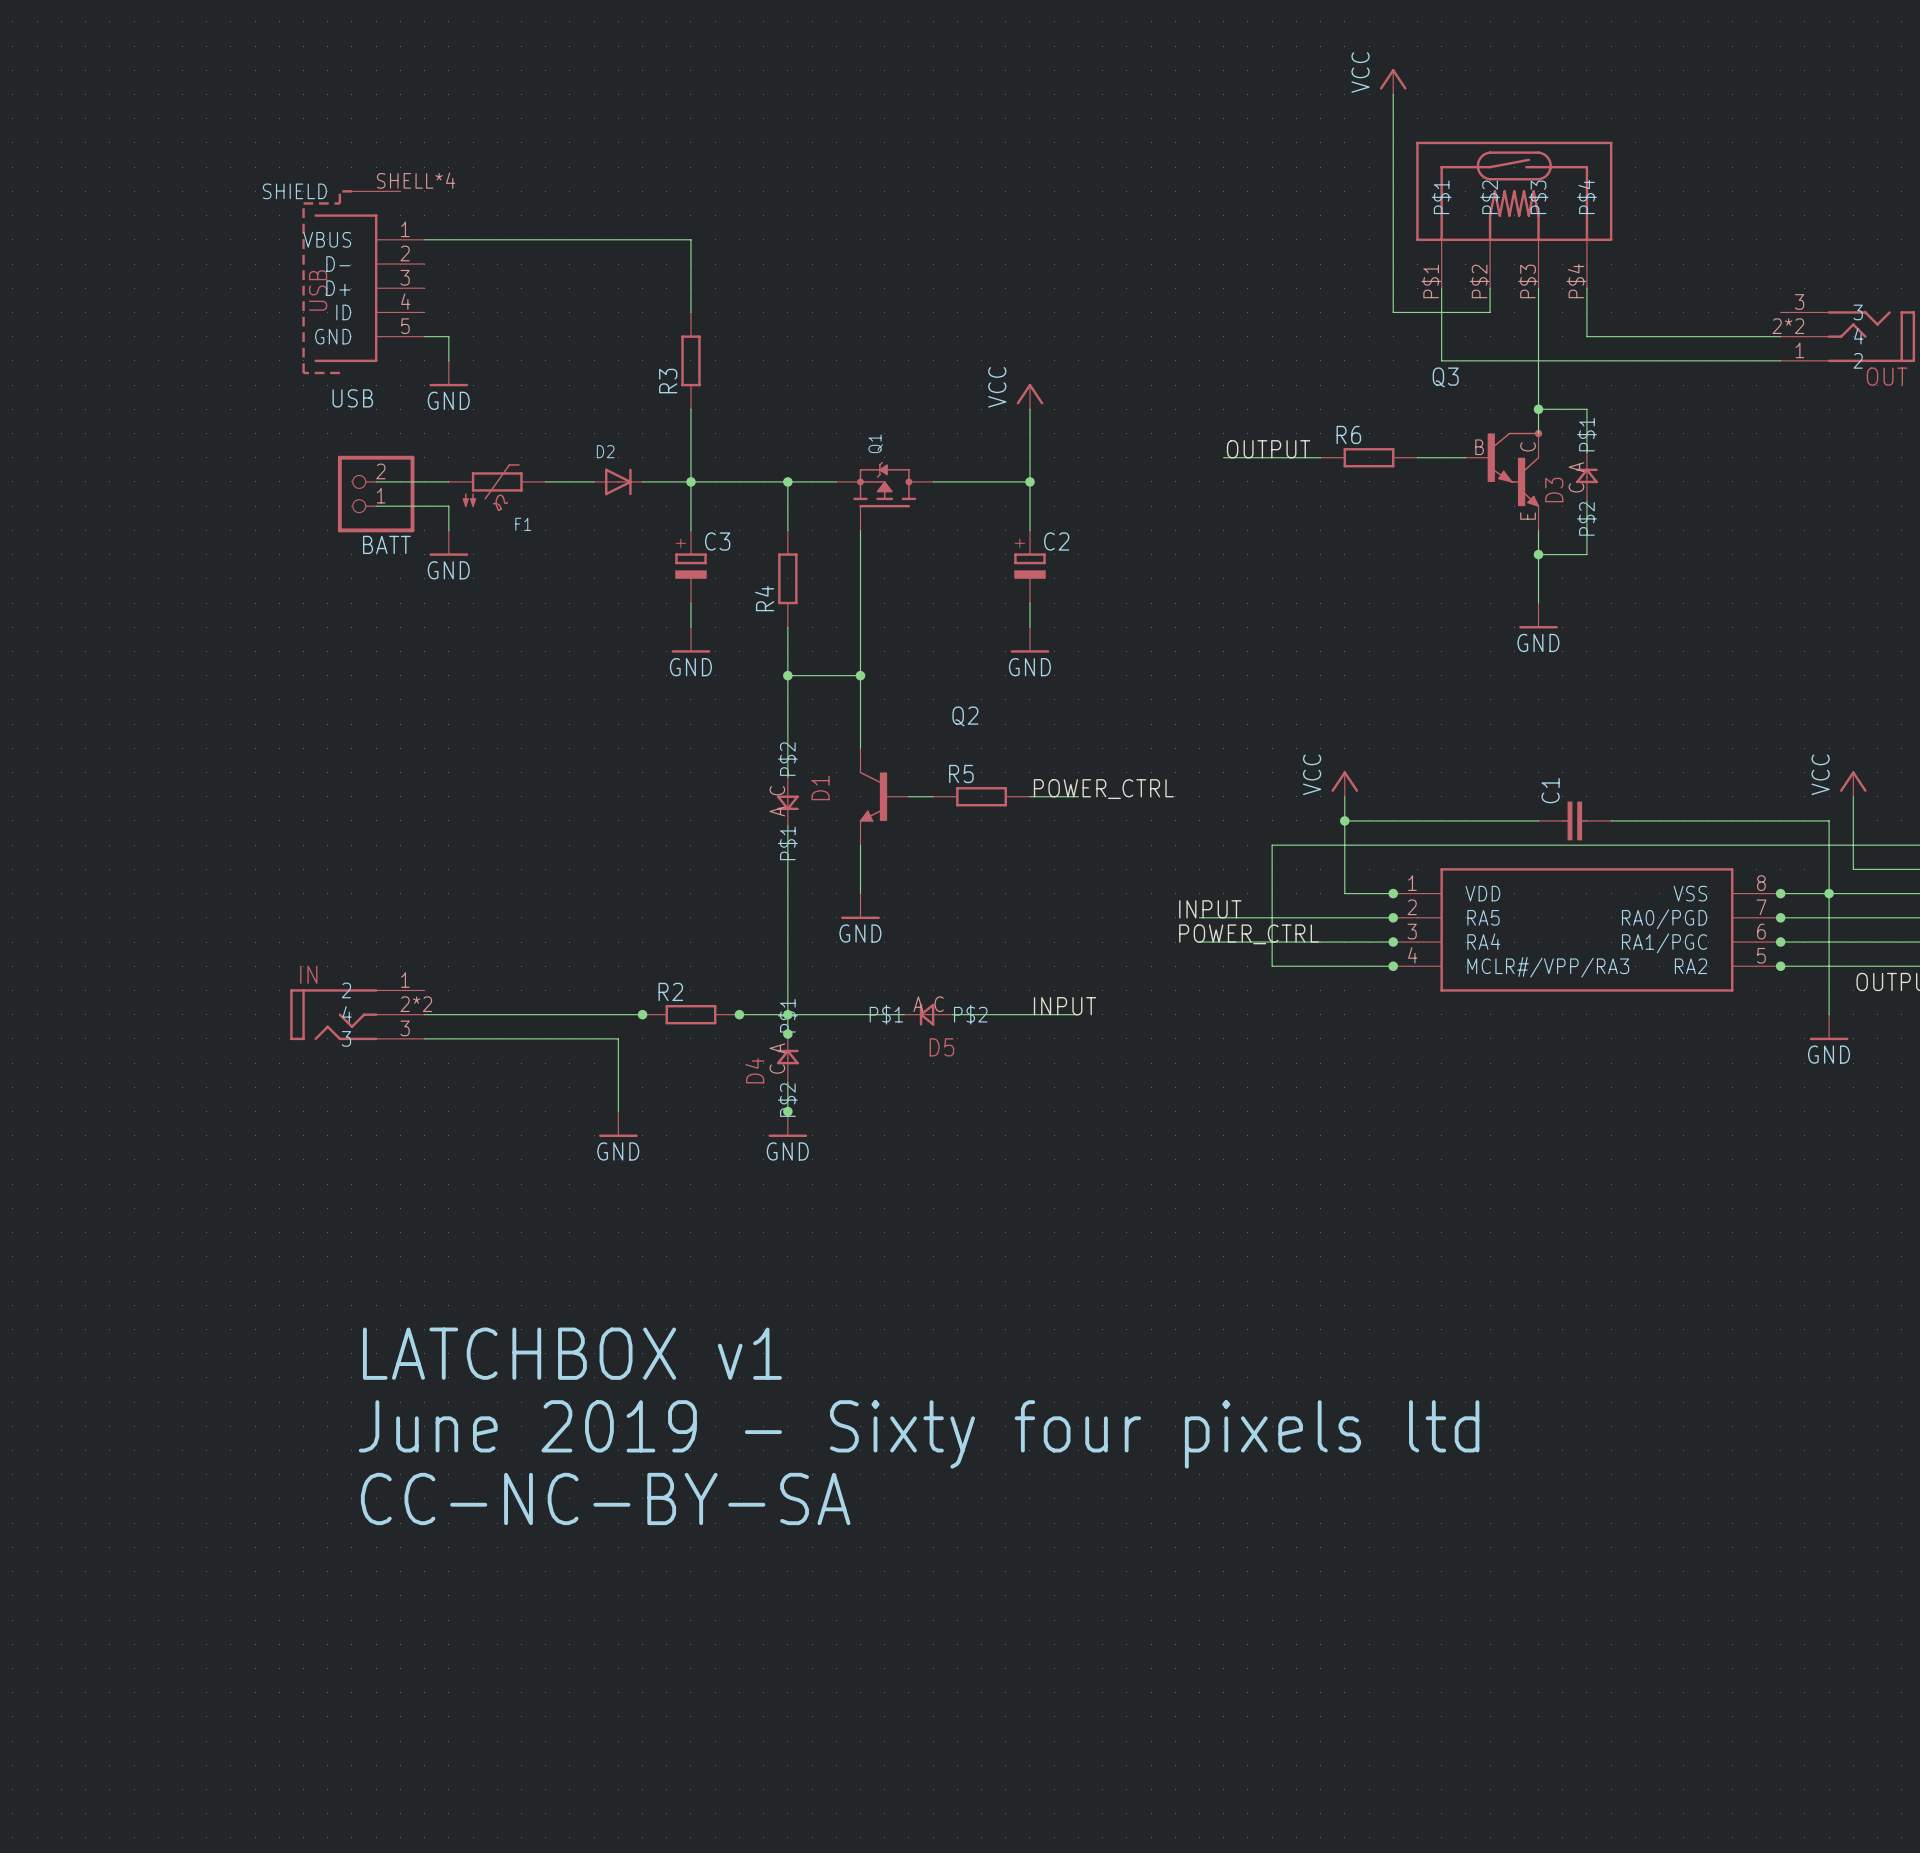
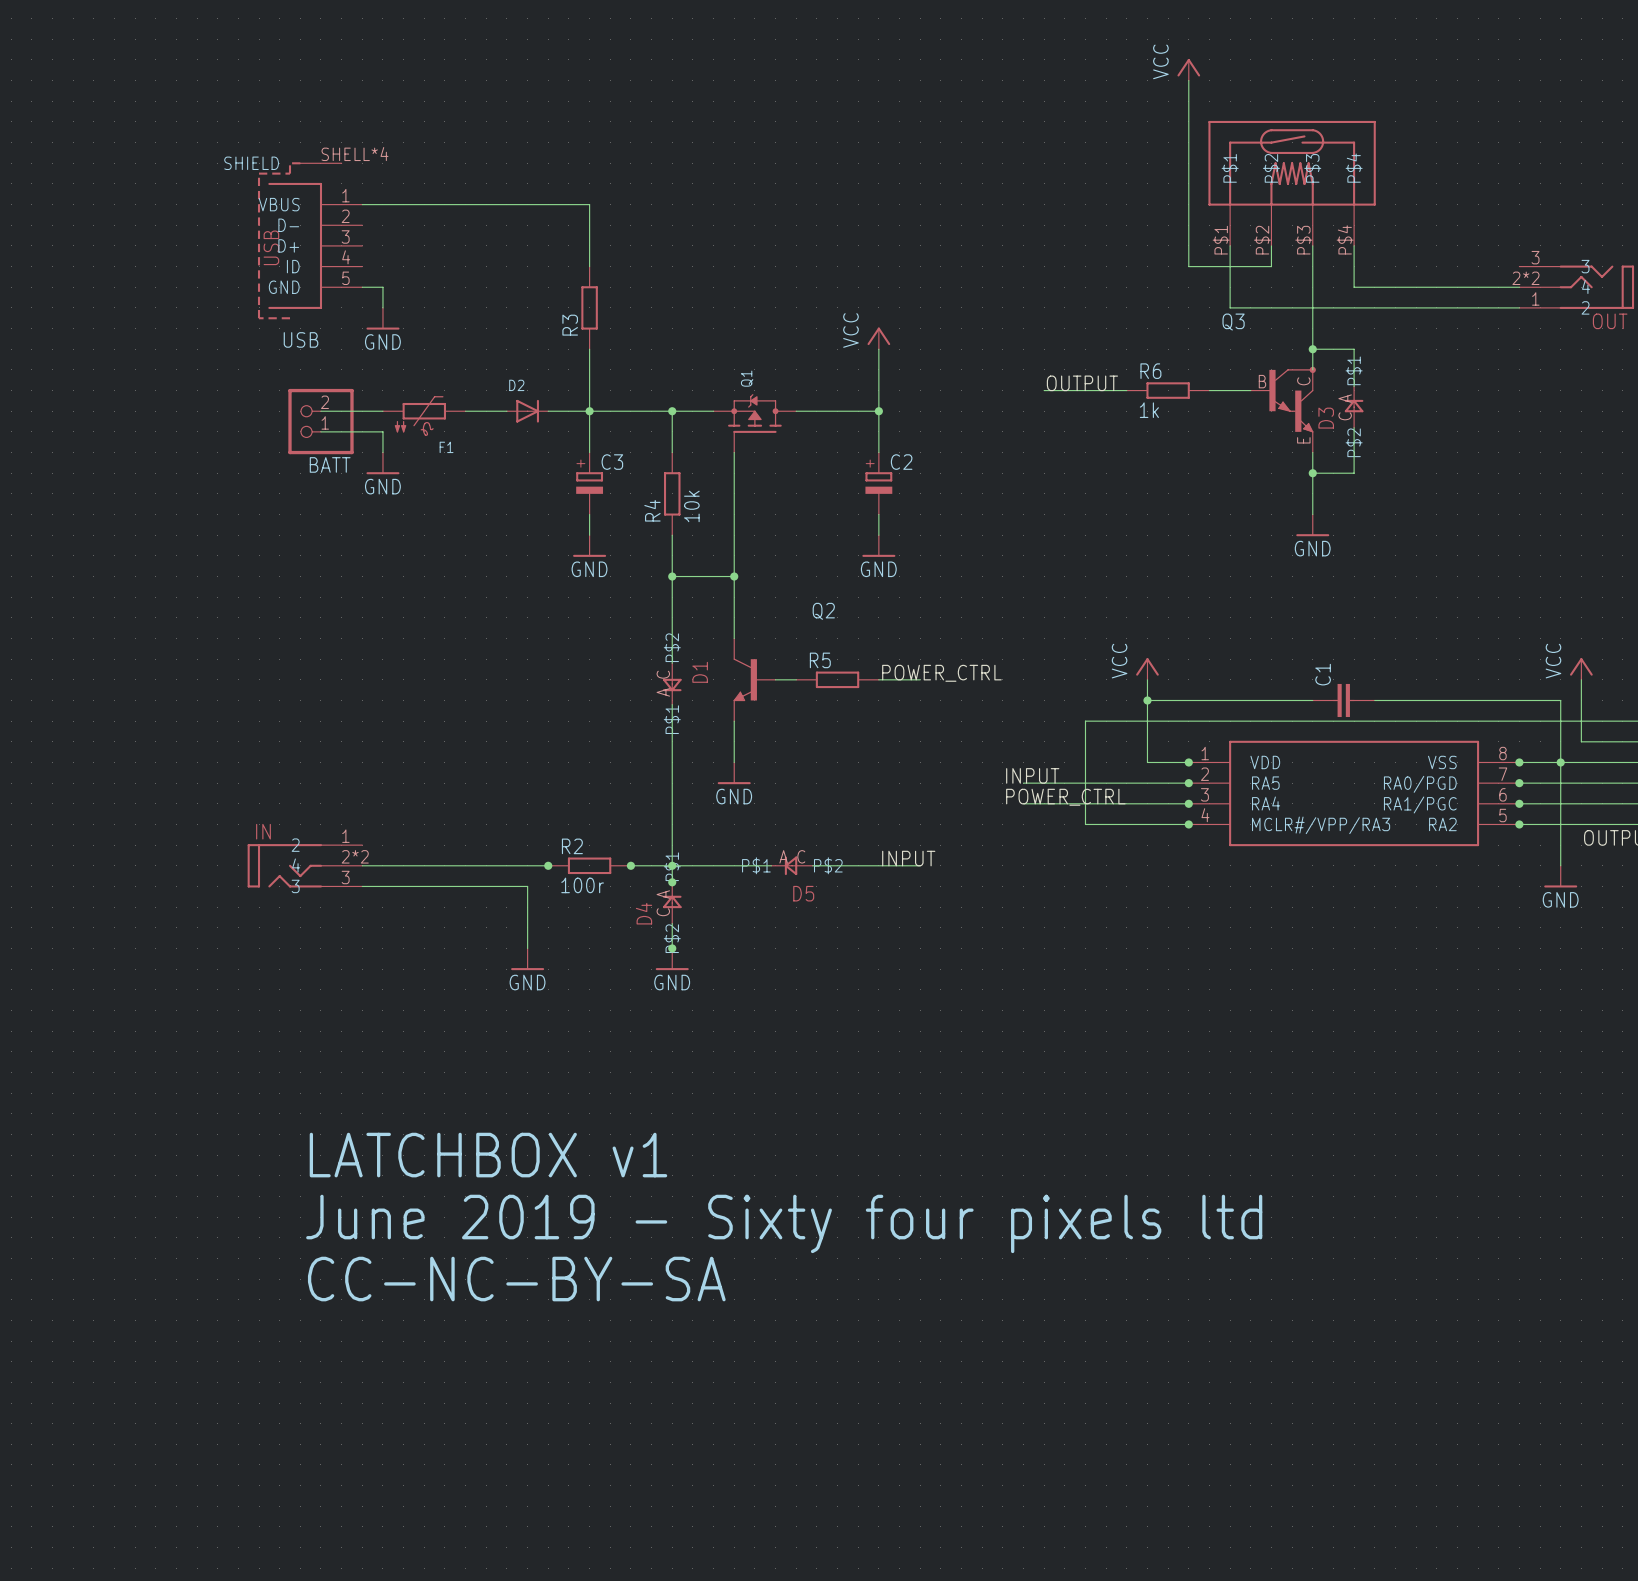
R6 value: none -> 1k (1149, 410)
R4 value: none -> 10k (691, 506)
R2 value: none -> 100r (582, 885)

